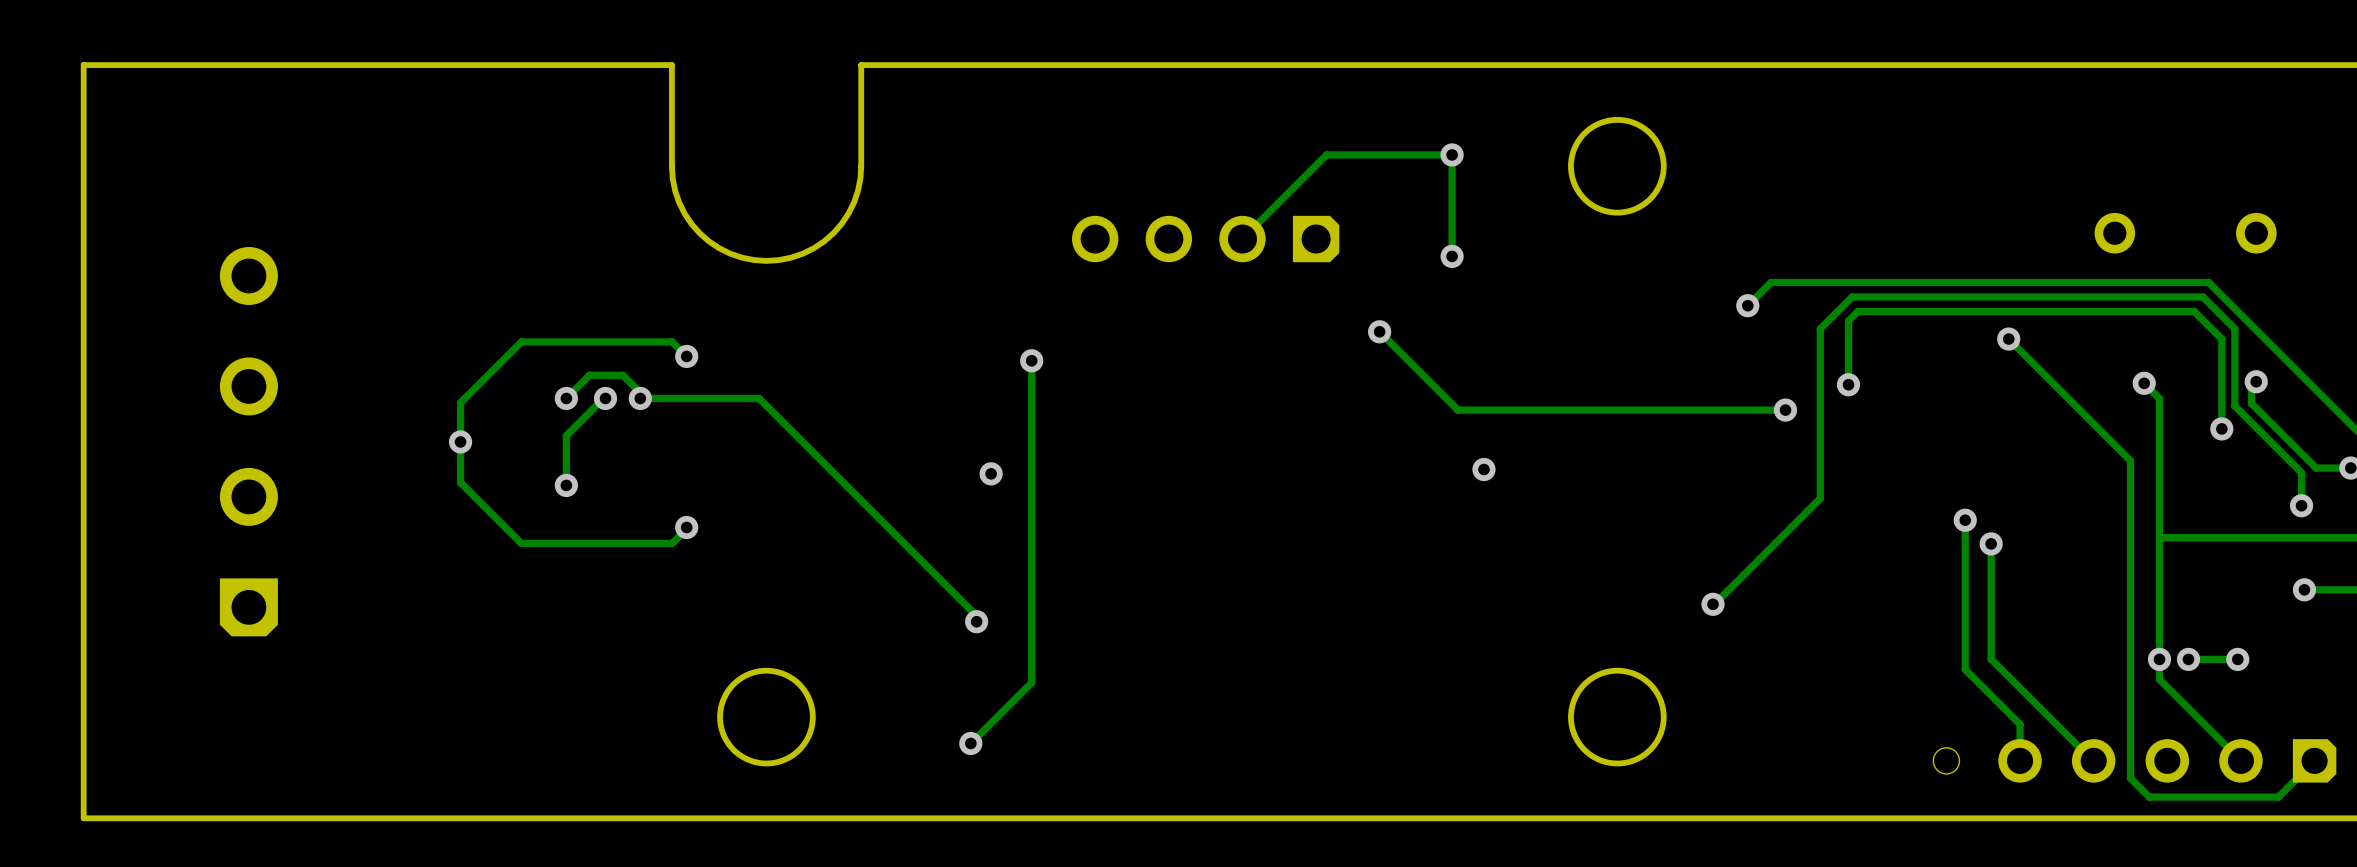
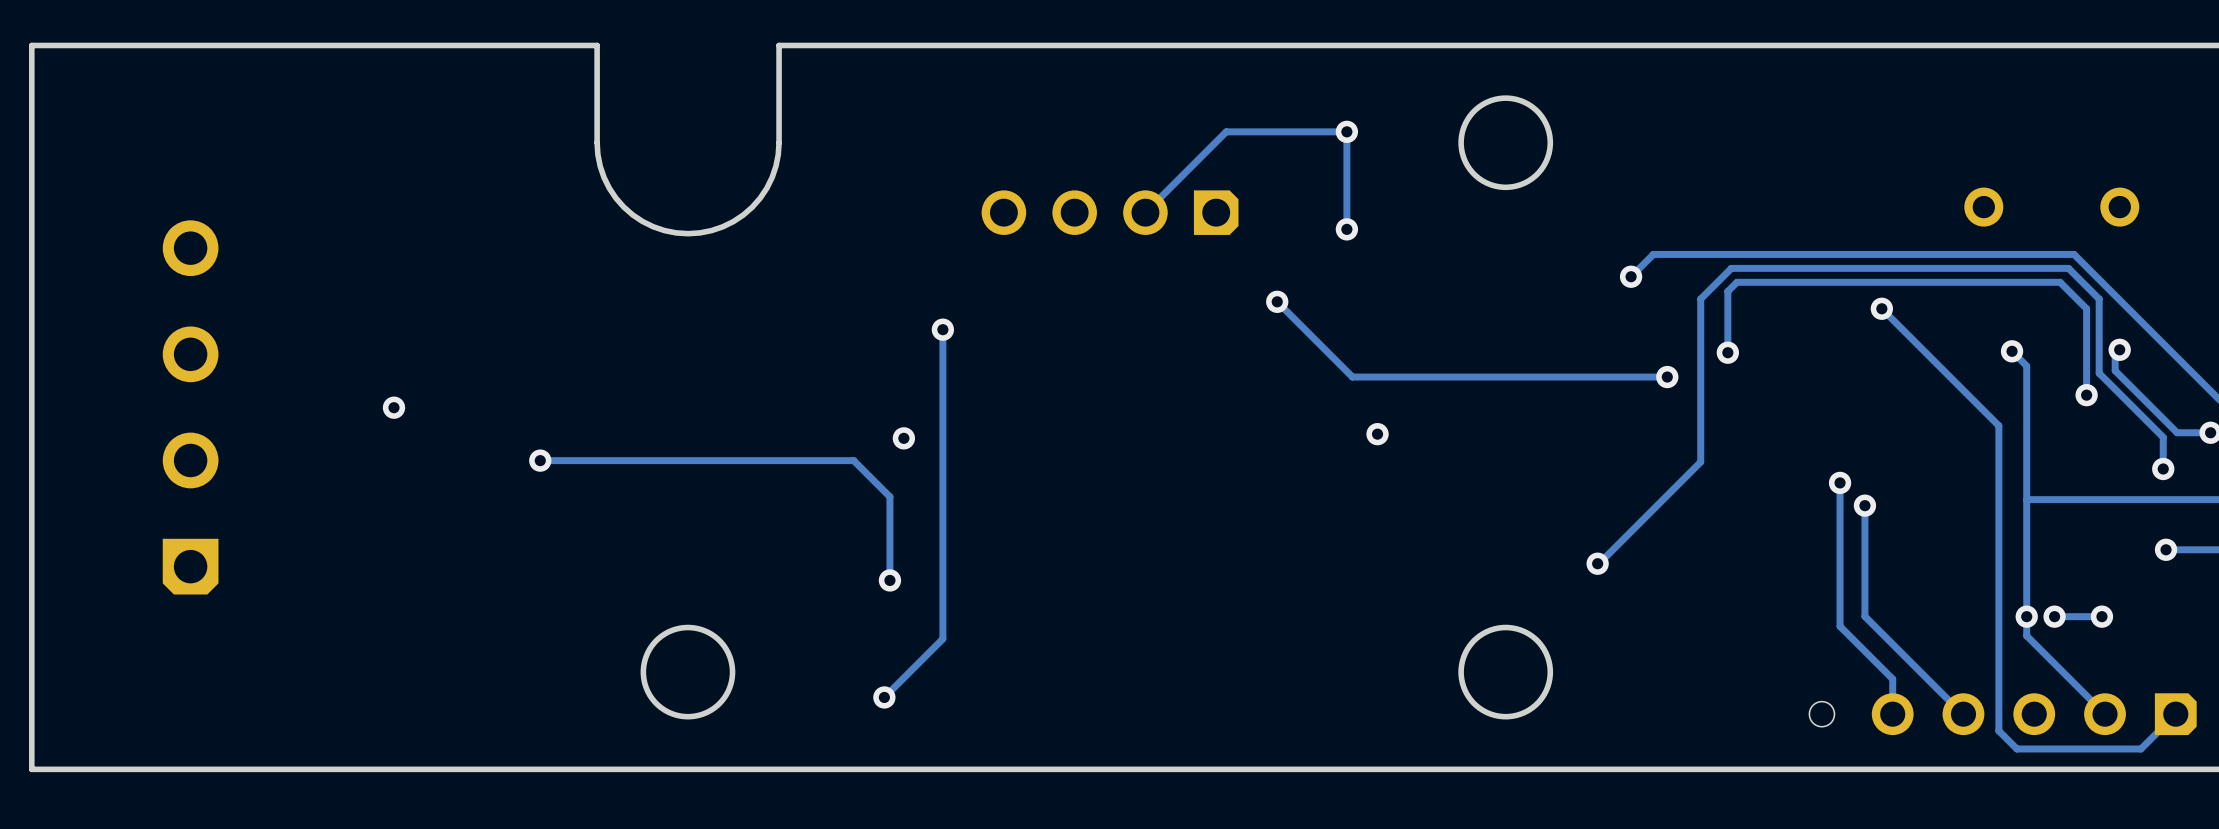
track: (686, 356) (672, 341) (521, 341) (460, 402) (460, 482) (521, 543) (672, 543) (686, 527) -> none
via: (686, 356) -> none
track: (566, 398) (589, 375) (622, 375) (640, 392) (640, 398) (759, 398) (976, 615) -> (540, 460) (853, 460) (889, 496) (889, 574)
via: (566, 398) -> none
track: (603, 398) (566, 435) (566, 485) -> none
via: (605, 398) -> none
via: (640, 398) -> none
via: (566, 485) -> none
via: none -> (540, 460)
via: (686, 527) -> none

